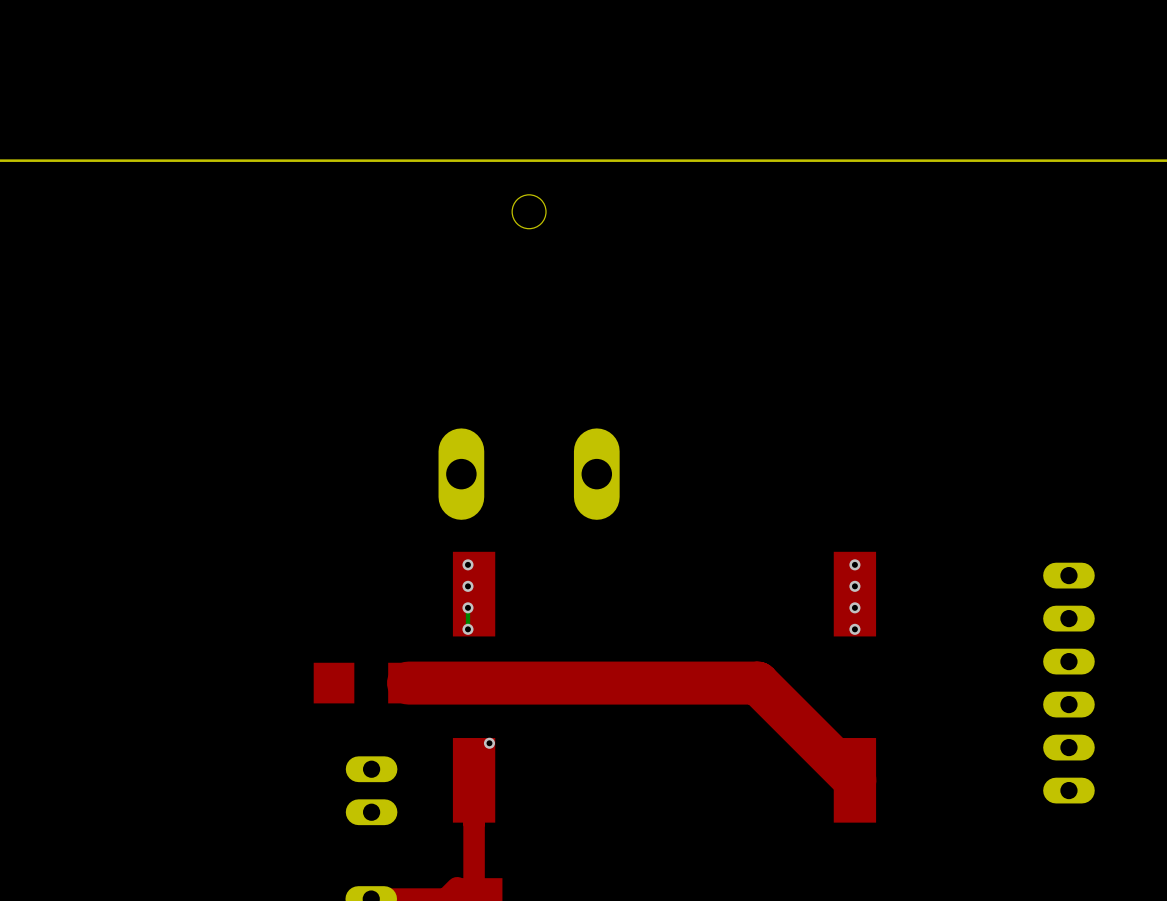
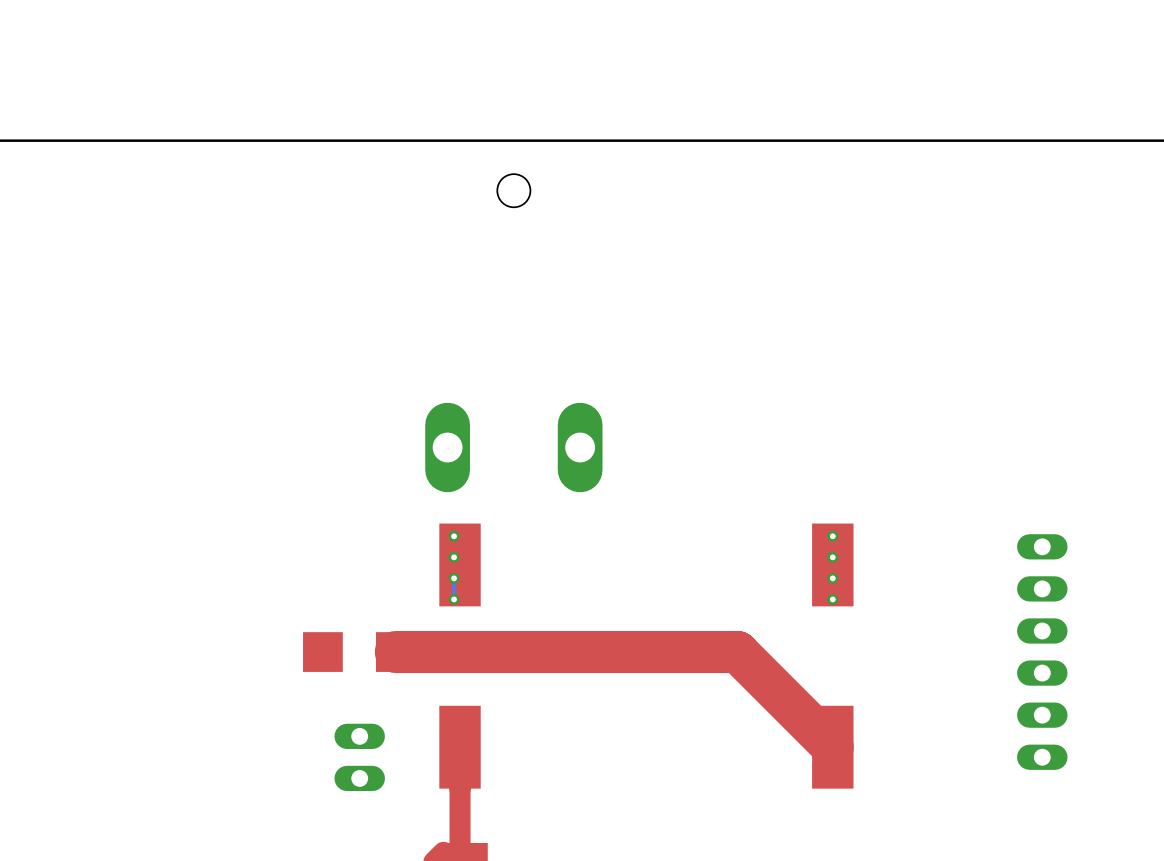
via: (489, 743) -> none

